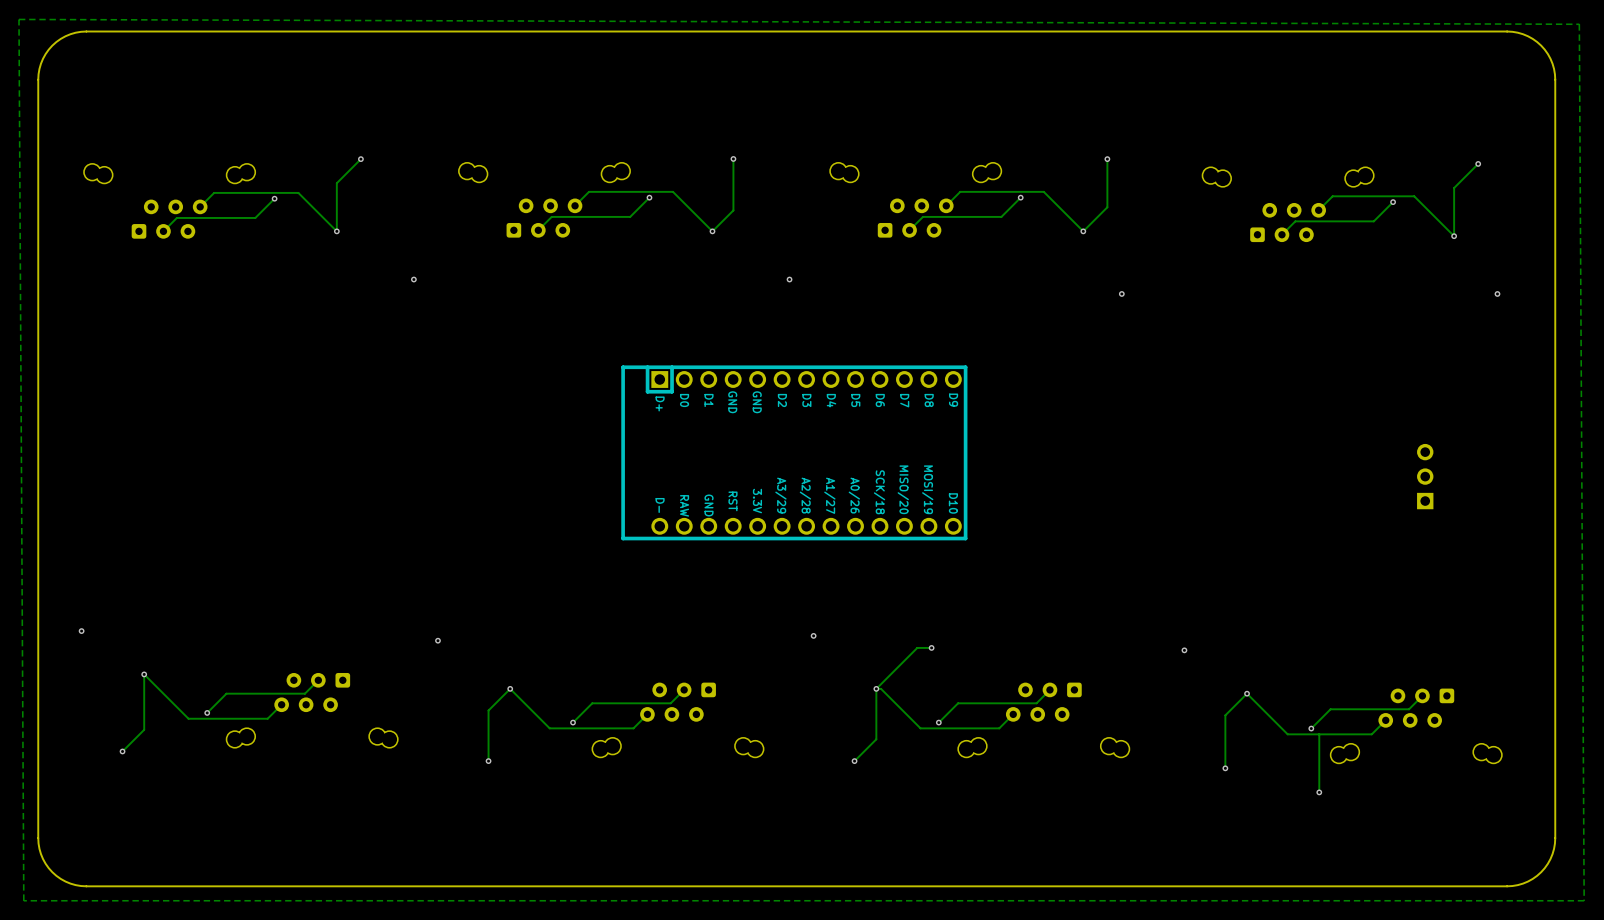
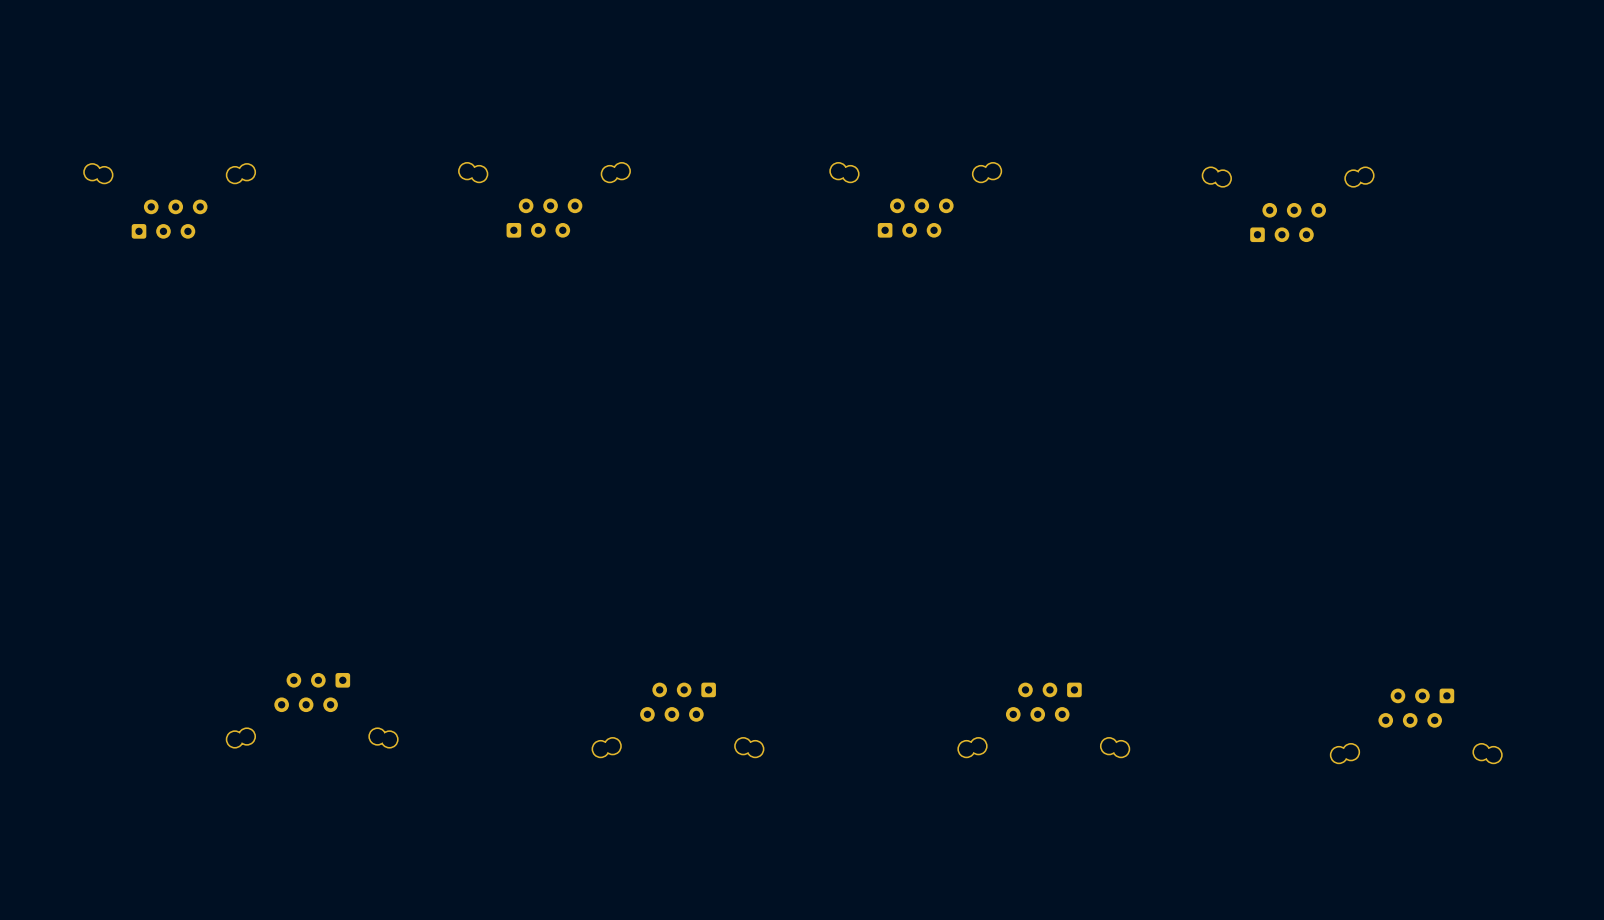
zone outline: (18, 19) (23, 900) (1584, 900) (1579, 24) (18, 19) -> none
board edge: (1507, 31) (86, 31) (75, 32) (60, 38) (45, 54) (40, 63) (38, 79) (38, 838) (39, 848) (45, 863) (52, 872) (65, 881) (86, 886) (1507, 886) (1517, 885) (1532, 878) (1541, 872) (1550, 859) (1555, 838) (1555, 79) (1552, 63) (1541, 45) (1527, 36) (1507, 31) -> none
track: (733, 158) (733, 210) (712, 231) (672, 191) (589, 191) (575, 205) -> none
via: (733, 158) -> none
track: (360, 159) (336, 183) (336, 231) (298, 192) (214, 192) (200, 206) -> none
via: (360, 159) -> none
track: (1107, 159) (1107, 207) (1083, 231) (1043, 191) (960, 191) (946, 205) -> none
via: (1107, 159) -> none
track: (1478, 163) (1454, 188) (1454, 236) (1414, 196) (1332, 196) (1318, 210) -> none
via: (1478, 163) -> none
track: (649, 197) (630, 216) (551, 216) (538, 230) -> none
via: (649, 197) -> none
track: (1020, 197) (1001, 216) (922, 216) (909, 230) -> none
via: (1020, 197) -> none
track: (274, 198) (255, 217) (176, 217) (163, 231) -> none
via: (274, 198) -> none
track: (1393, 202) (1373, 221) (1295, 221) (1281, 234) -> none
via: (1393, 202) -> none
via: (336, 231) -> none
via: (712, 231) -> none
via: (1083, 231) -> none
via: (1454, 236) -> none
via: (413, 279) -> none
via: (789, 279) -> none
via: (1121, 293) -> none
via: (1497, 293) -> none
part: (794, 452) -> none
part: (1425, 476) -> none
via: (81, 631) -> none
via: (813, 635) -> none
via: (437, 640) -> none
track: (931, 647) (917, 647) (876, 688) -> none
via: (931, 647) -> none
via: (1184, 650) -> none
via: (144, 674) -> none
track: (318, 680) (304, 693) (226, 693) (207, 712) -> none
via: (510, 688) -> none
track: (876, 688) (876, 739) (854, 761) -> none
track: (876, 688) (881, 688) (920, 728) (999, 728) (1013, 714) -> none
via: (876, 688) -> none
track: (684, 689) (670, 703) (592, 703) (573, 722) -> none
track: (1049, 689) (1036, 703) (958, 703) (938, 722) -> none
via: (1247, 693) -> none
track: (1422, 695) (1409, 709) (1330, 709) (1311, 728) -> none
track: (281, 704) (267, 718) (188, 718) (144, 674) (144, 729) (122, 751) -> none
via: (207, 712) -> none
track: (647, 714) (633, 728) (549, 728) (510, 688) (488, 710) (488, 761) -> none
track: (1385, 720) (1371, 734) (1287, 734) (1247, 693) (1225, 715) (1225, 768) -> none
via: (573, 722) -> none
via: (938, 722) -> none
via: (1311, 728) -> none
track: (1319, 734) (1319, 792) -> none
via: (122, 751) -> none
via: (488, 761) -> none
via: (854, 761) -> none
via: (1225, 768) -> none
via: (1319, 792) -> none

